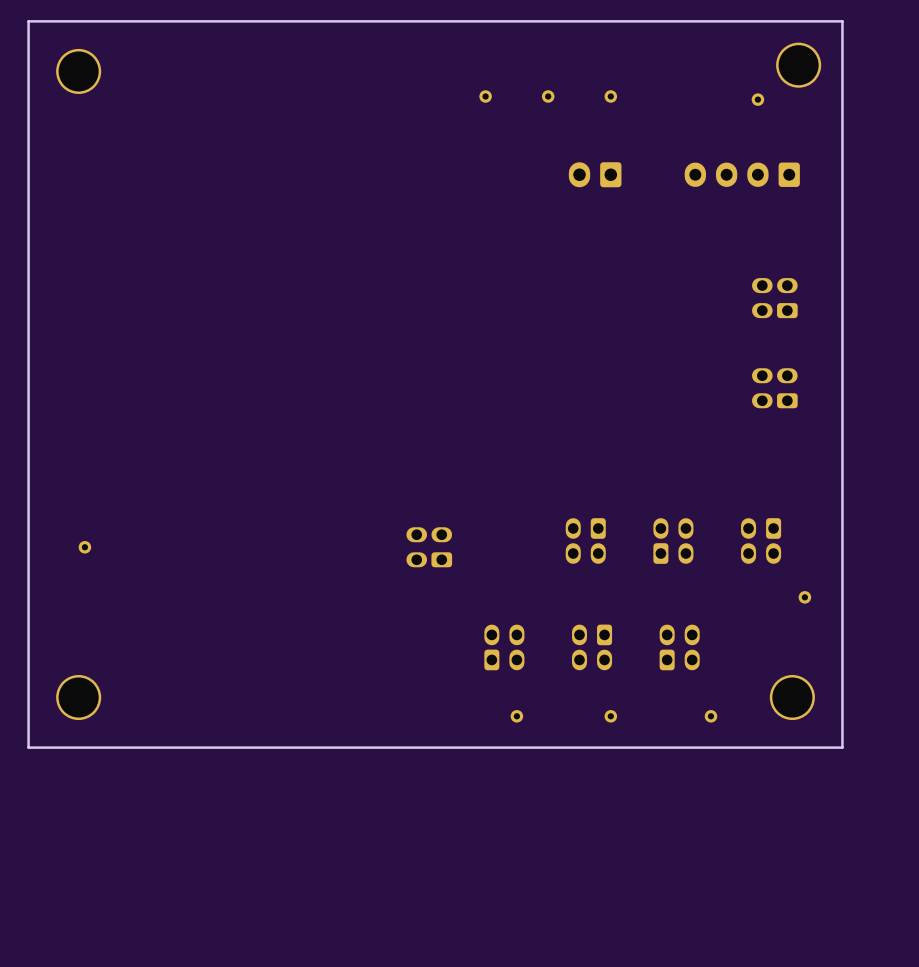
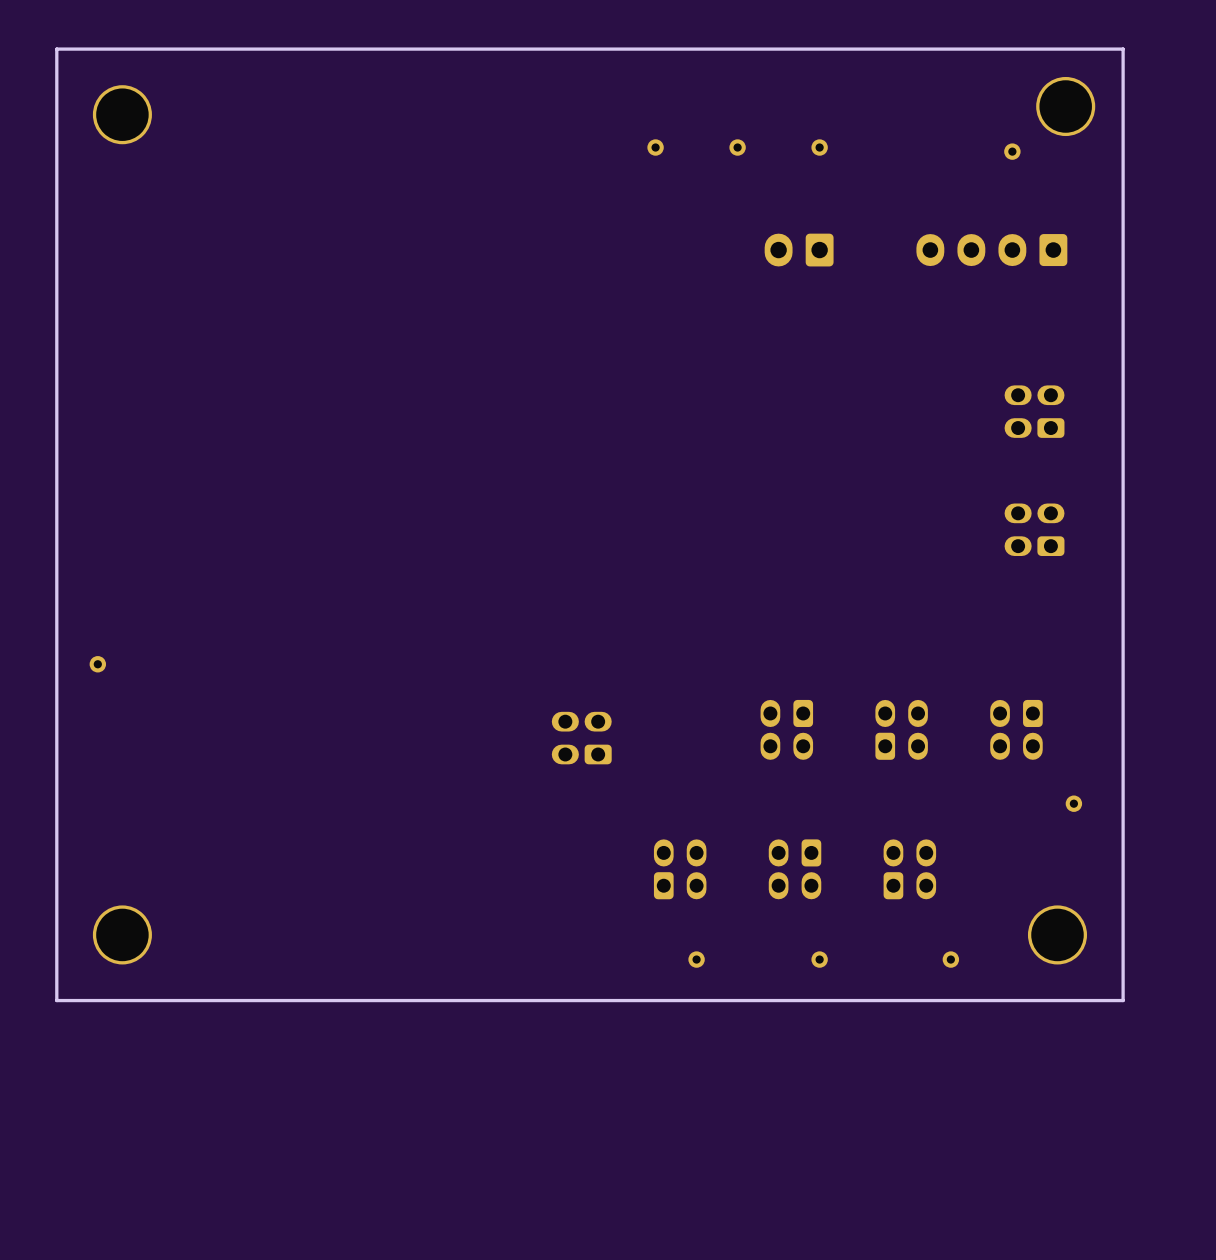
part position: (84, 547) -> (97, 664)

